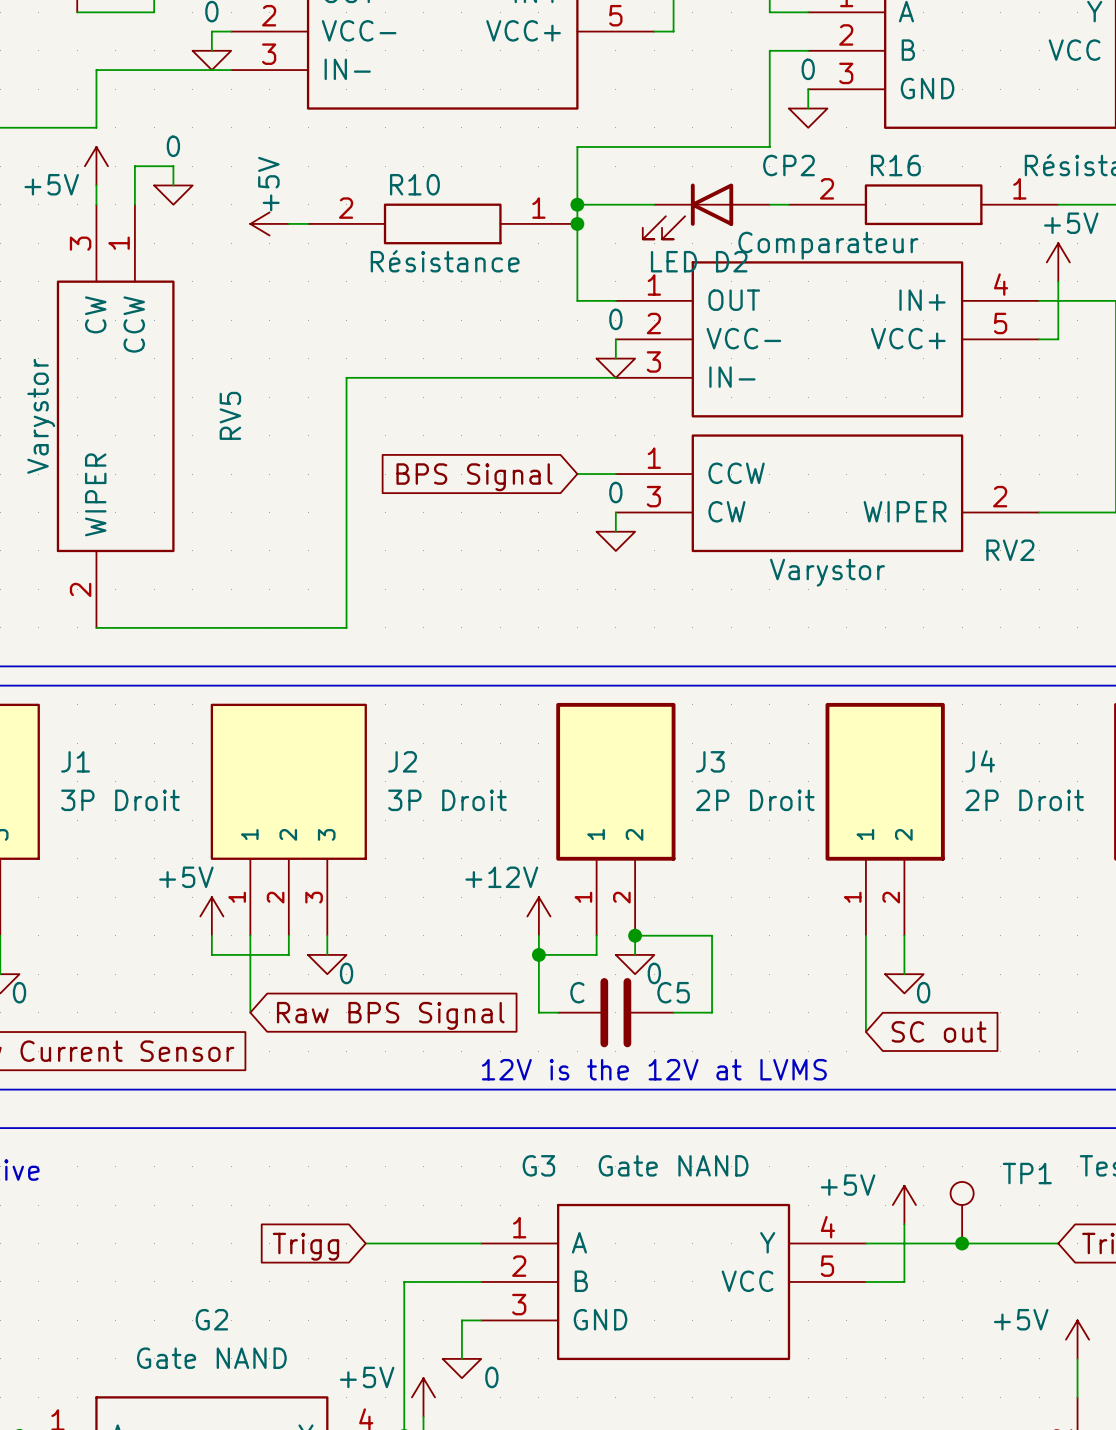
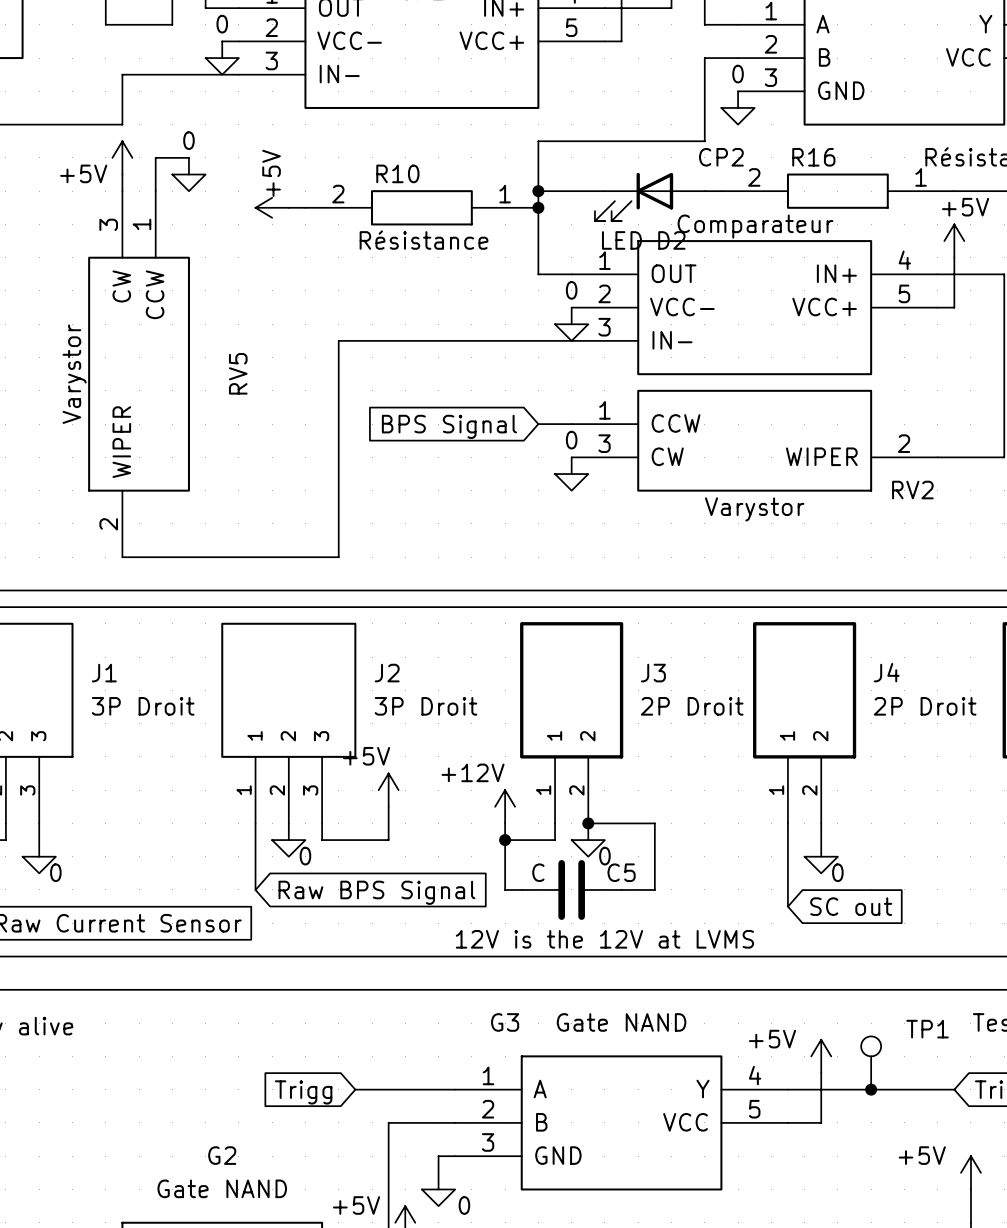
power symbol position: +5V (211, 916) -> +5V (388, 790)
wire: none -> (388, 806) (388, 840) (322, 840)
wire: (211, 935) (211, 954) (288, 954) -> none
power symbol position: 0 (327, 964) -> 0 (288, 848)

